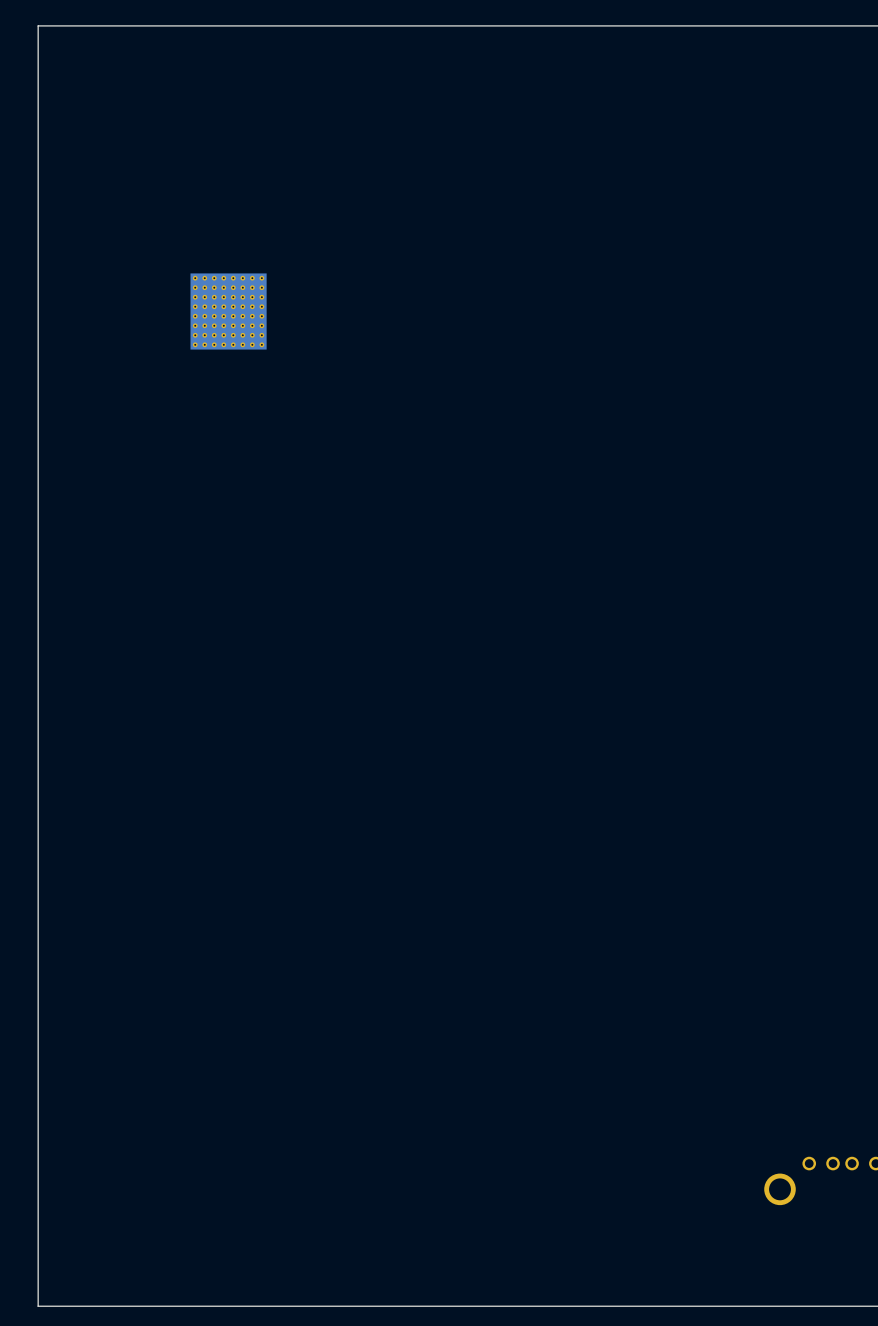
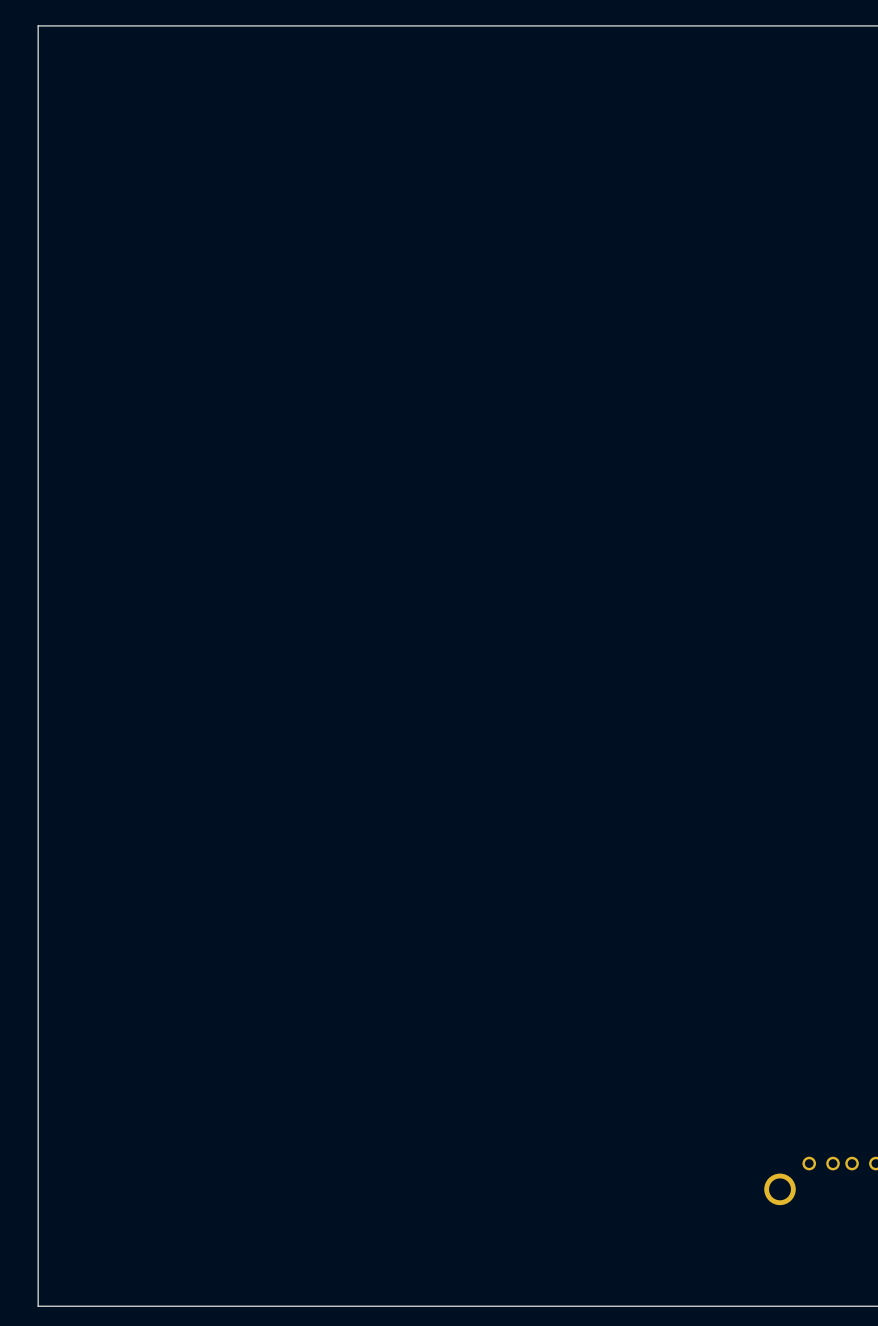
part: (228, 311) -> none

